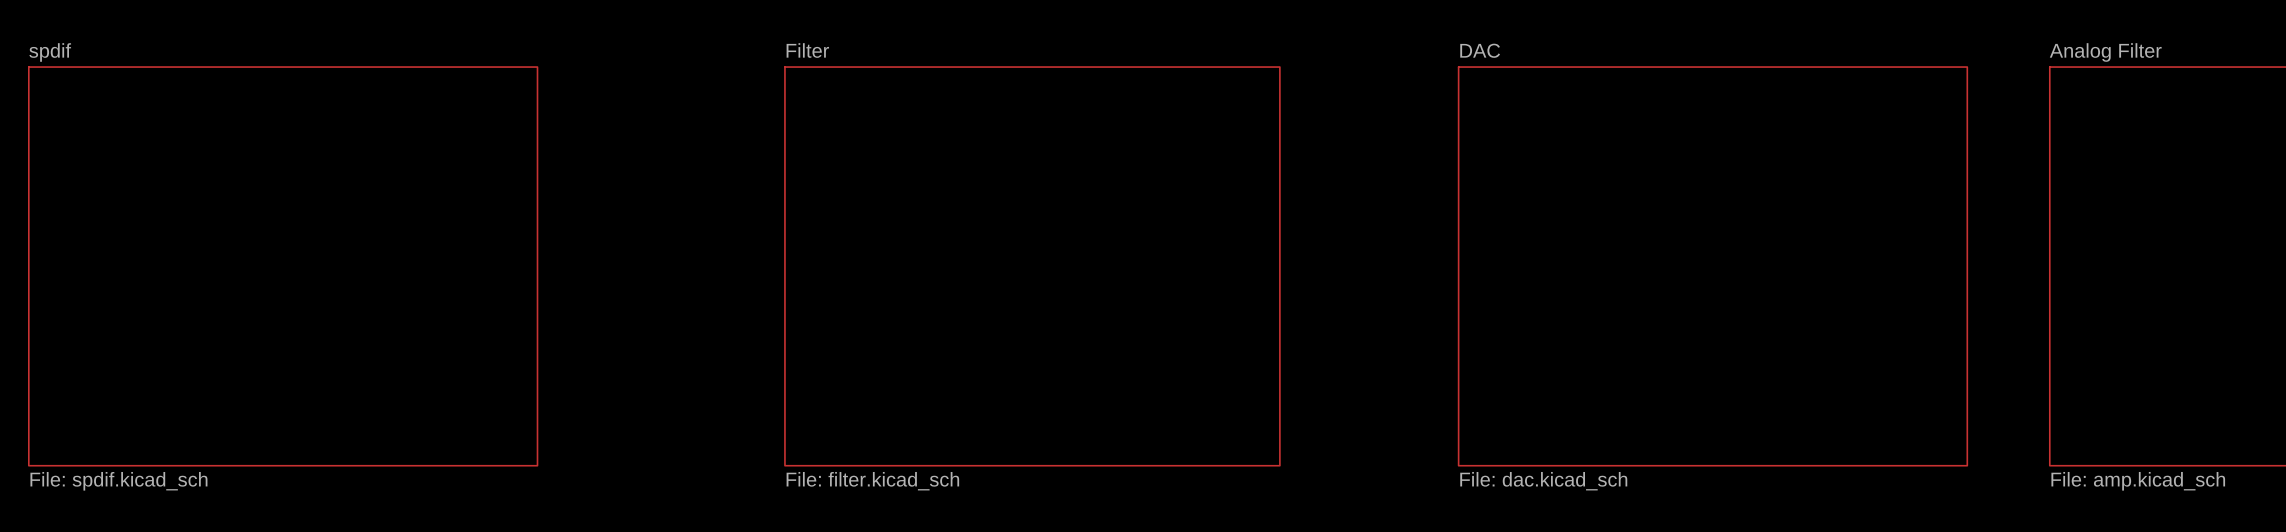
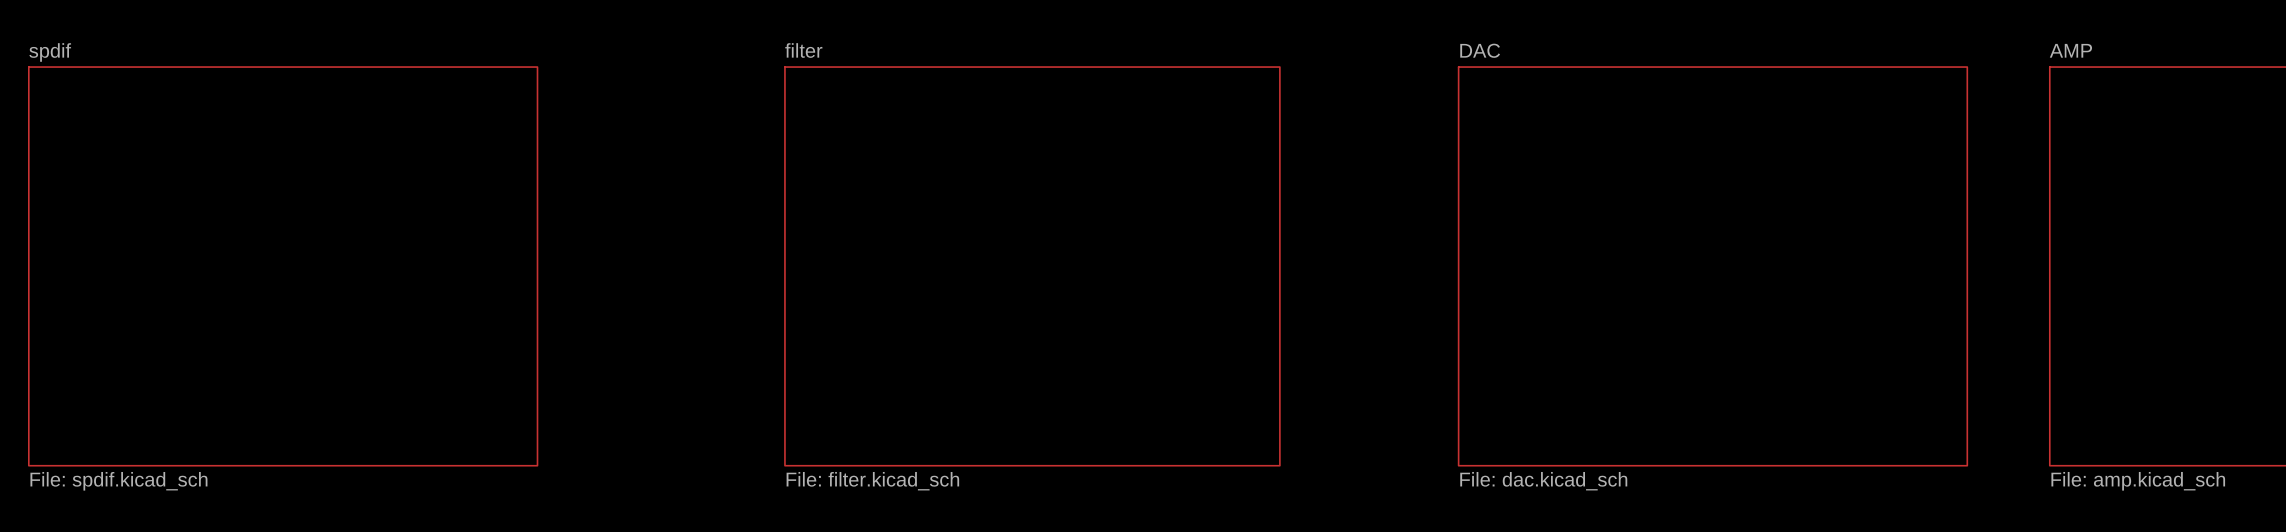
sheet Filter name: Filter (807, 50) -> filter (803, 50)
sheet Analog Filter name: Analog Filter (2105, 52) -> AMP (2070, 50)

